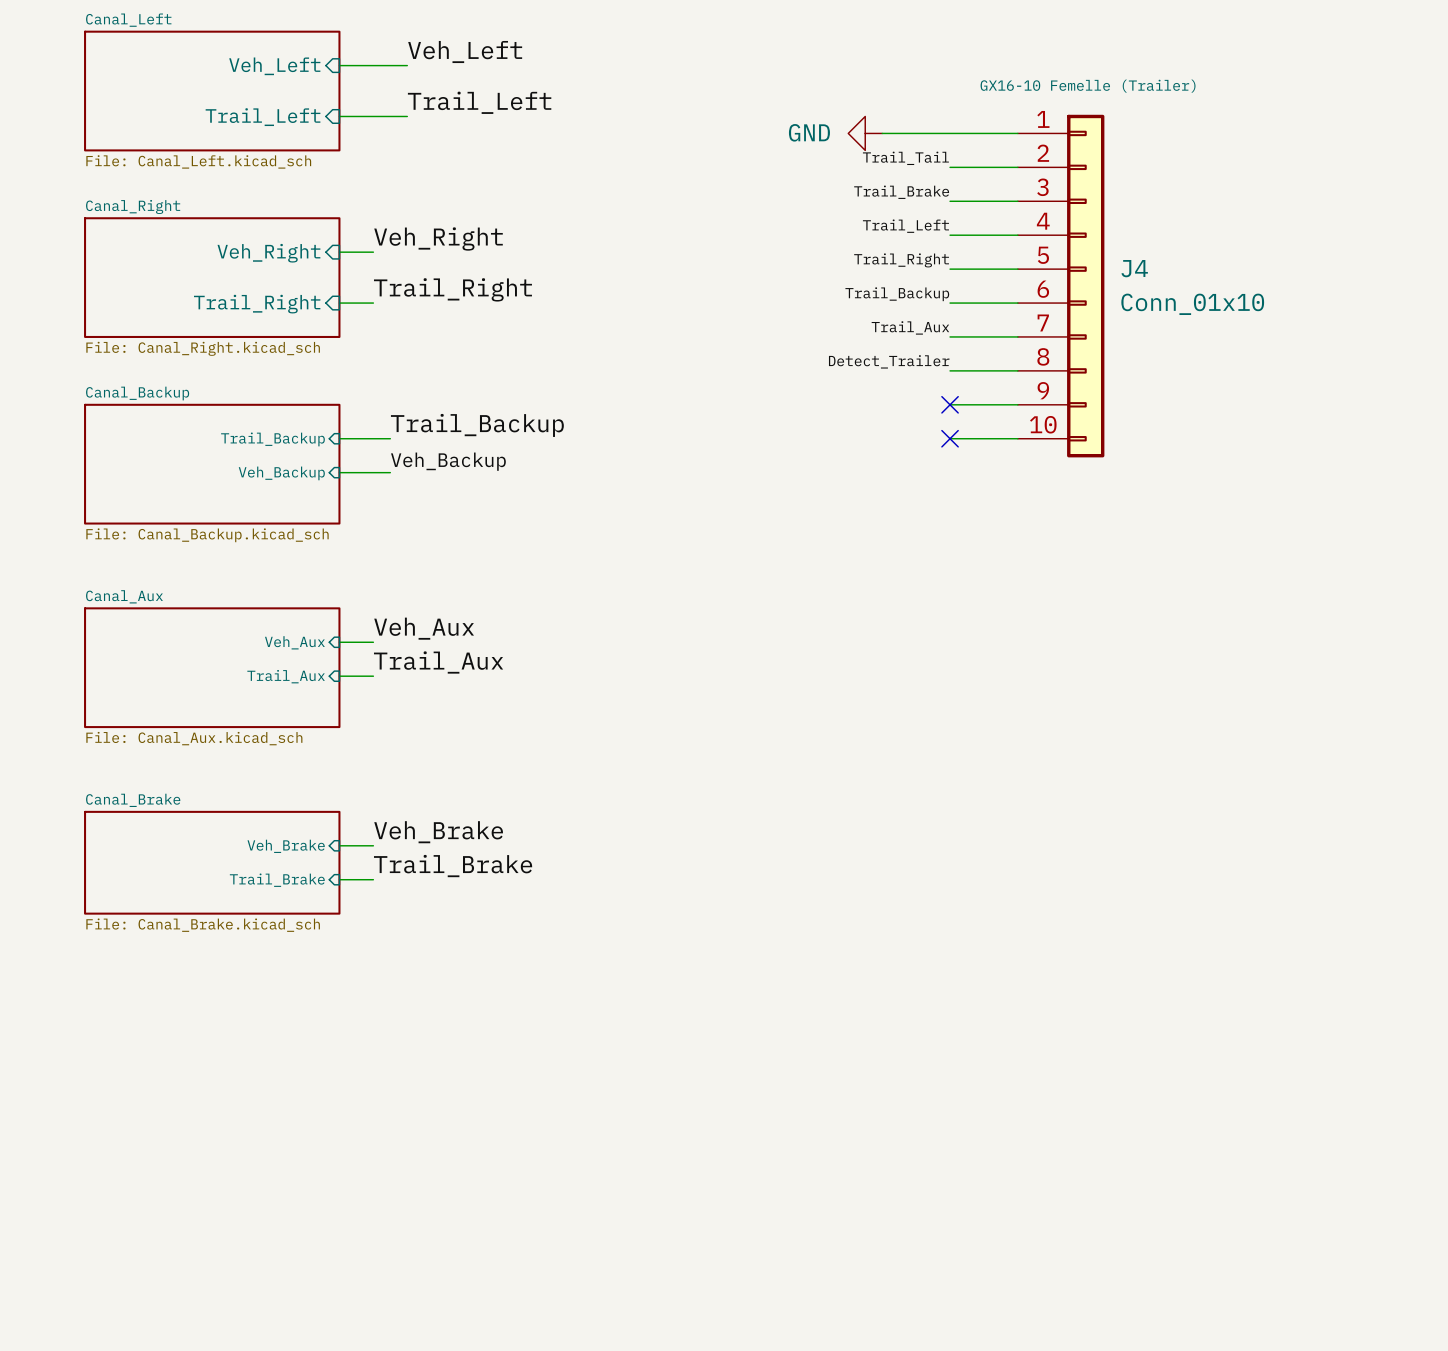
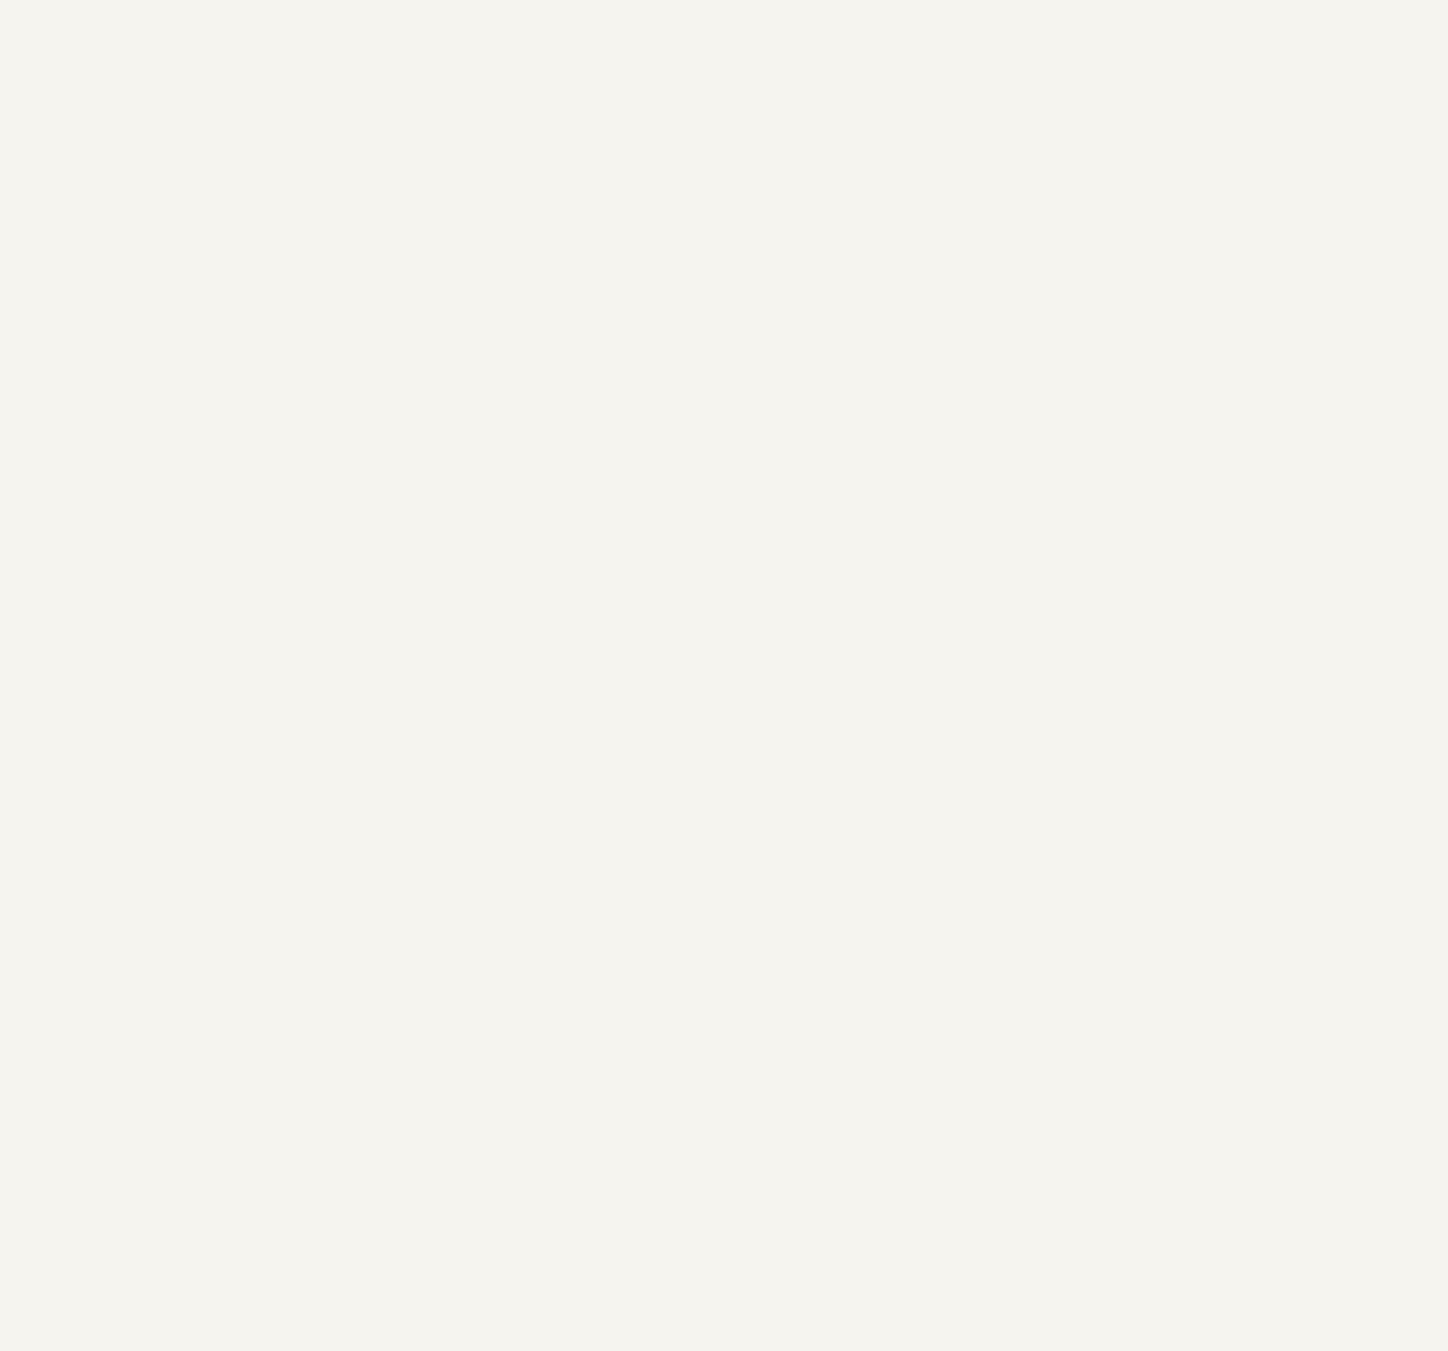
label: Veh_Left (465, 52) -> none
wire: (339, 65) (407, 65) -> none
sheet pin: Veh_Left (274, 66) -> none
sheet Canal_Left: File: Canal_Left.kicad_sch (212, 91) -> none
label: Trail_Left (479, 102) -> none
wire: (339, 116) (407, 116) -> none
sheet pin: Trail_Left (263, 117) -> none
power symbol: GND (865, 133) -> none
wire: (882, 133) (1017, 133) -> none
label: Trail_Tail (905, 158) -> none
wire: (950, 167) (1017, 167) -> none
label: Trail_Brake (901, 192) -> none
wire: (950, 201) (1017, 201) -> none
label: Trail_Left (905, 226) -> none
wire: (950, 235) (1017, 235) -> none
label: Veh_Right (438, 239) -> none
wire: (339, 252) (373, 252) -> none
sheet pin: Veh_Right (268, 253) -> none
label: Trail_Right (901, 260) -> none
wire: (950, 269) (1017, 269) -> none
sheet Canal_Right: File: Canal_Right.kicad_sch (212, 277) -> none
J4: Conn_01x10 (1061, 286) -> none
label: Trail_Right (452, 289) -> none
label: Trail_Backup (897, 294) -> none
wire: (339, 303) (373, 303) -> none
wire: (950, 303) (1017, 303) -> none
sheet pin: Trail_Right (257, 304) -> none
label: Trail_Aux (910, 327) -> none
wire: (950, 336) (1017, 336) -> none
label: Detect_Trailer (889, 361) -> none
wire: (950, 370) (1017, 370) -> none
wire: (950, 404) (1017, 404) -> none
no-connect mark: (950, 404) -> none
label: Trail_Backup (477, 425) -> none
wire: (339, 438) (390, 438) -> none
wire: (950, 438) (1017, 438) -> none
no-connect mark: (950, 438) -> none
sheet pin: Trail_Backup (272, 439) -> none
label: Veh_Backup (448, 461) -> none
sheet Canal_Backup: File: Canal_Backup.kicad_sch (212, 464) -> none
wire: (339, 472) (390, 472) -> none
sheet pin: Veh_Backup (281, 473) -> none
label: Veh_Aux (424, 628) -> none
sheet pin: Veh_Aux (294, 642) -> none
wire: (339, 642) (373, 642) -> none
label: Trail_Aux (438, 662) -> none
sheet Canal_Aux: File: Canal_Aux.kicad_sch (212, 667) -> none
sheet pin: Trail_Aux (286, 676) -> none
wire: (339, 676) (373, 676) -> none
label: Veh_Brake (438, 832) -> none
wire: (339, 845) (373, 845) -> none
sheet pin: Veh_Brake (286, 846) -> none
sheet Canal_Brake: File: Canal_Brake.kicad_sch (212, 862) -> none
label: Trail_Brake (453, 866) -> none
wire: (339, 879) (373, 879) -> none
sheet pin: Trail_Brake (277, 880) -> none

